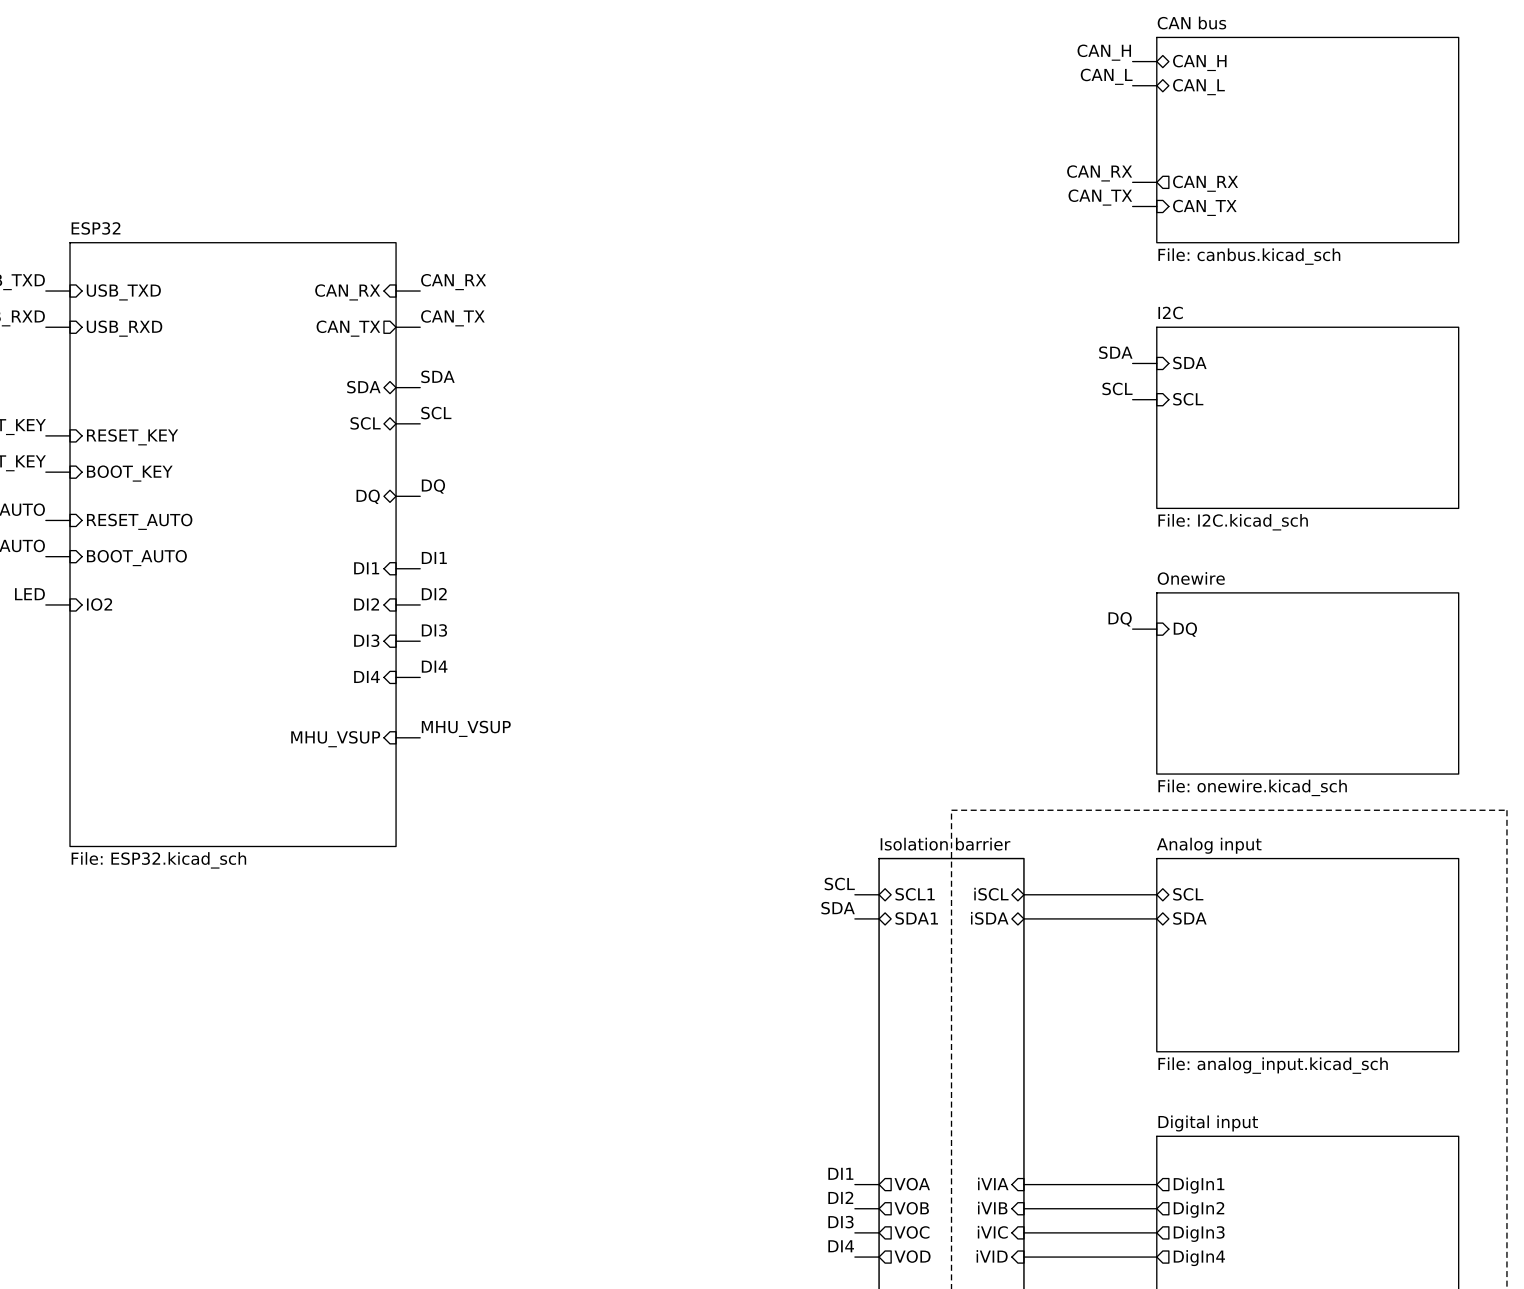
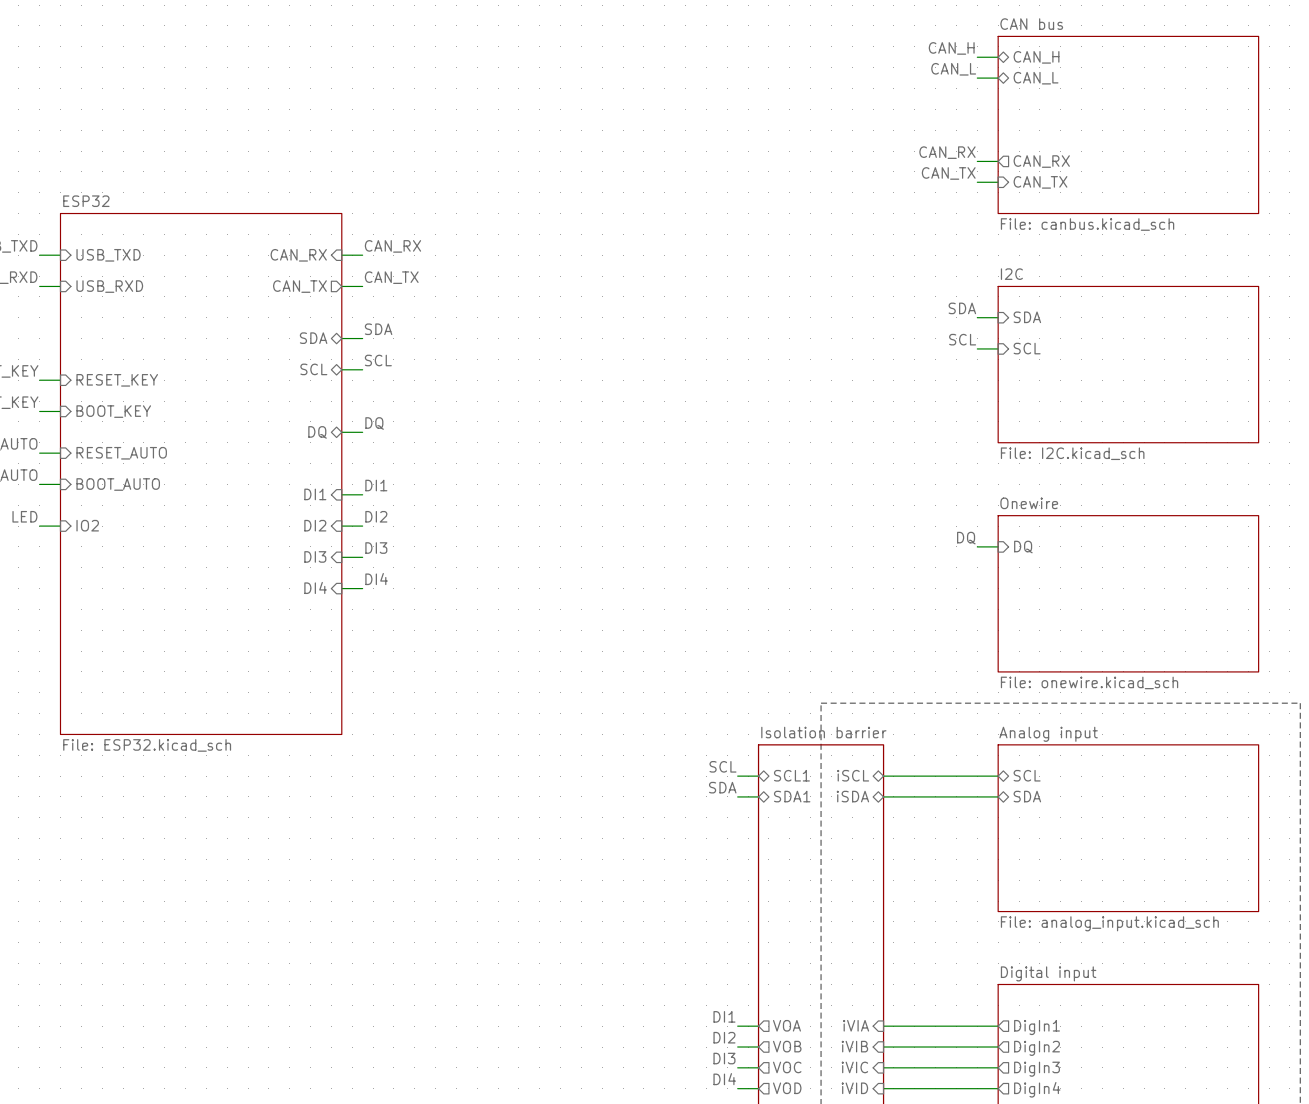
label: MHU_VSUP (466, 728) -> none
wire: (396, 737) (420, 737) -> none
sheet pin: MHU_VSUP (335, 739) -> none

